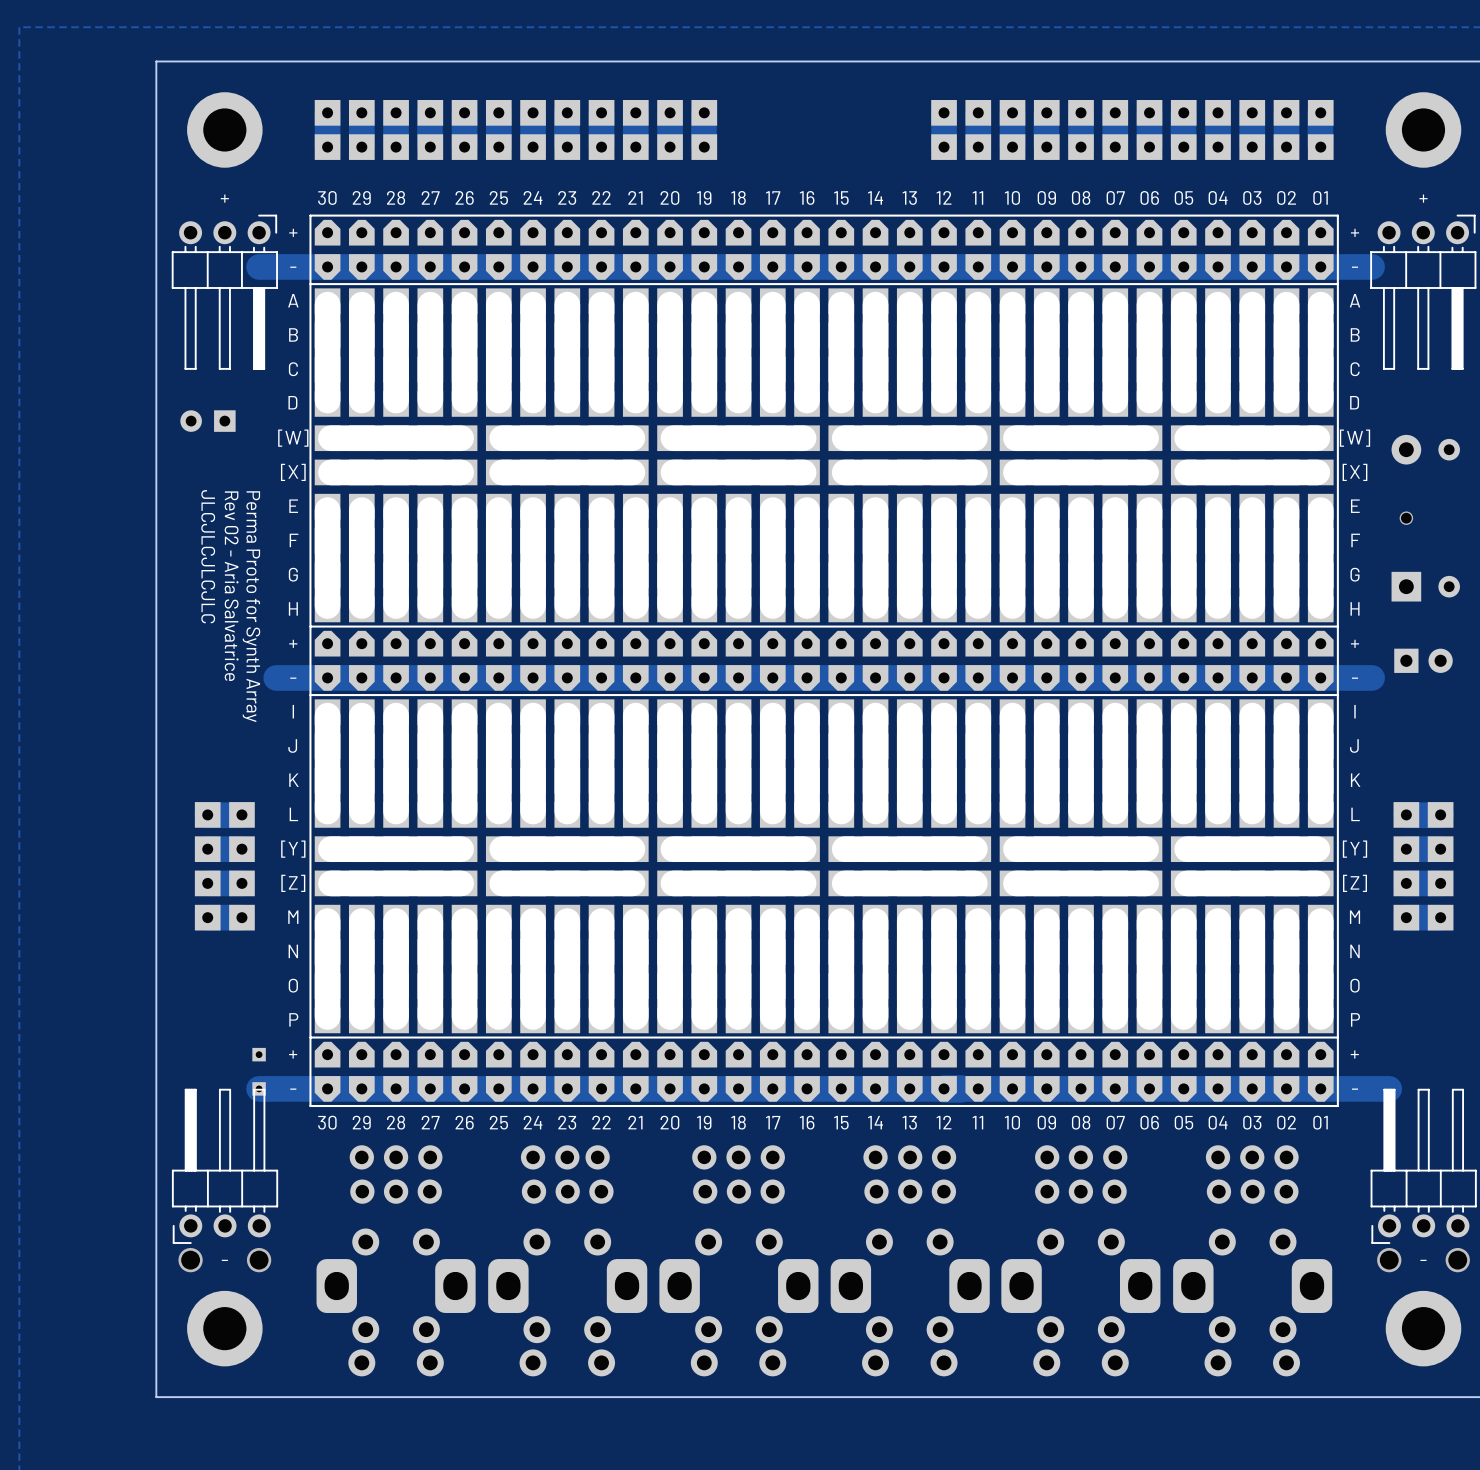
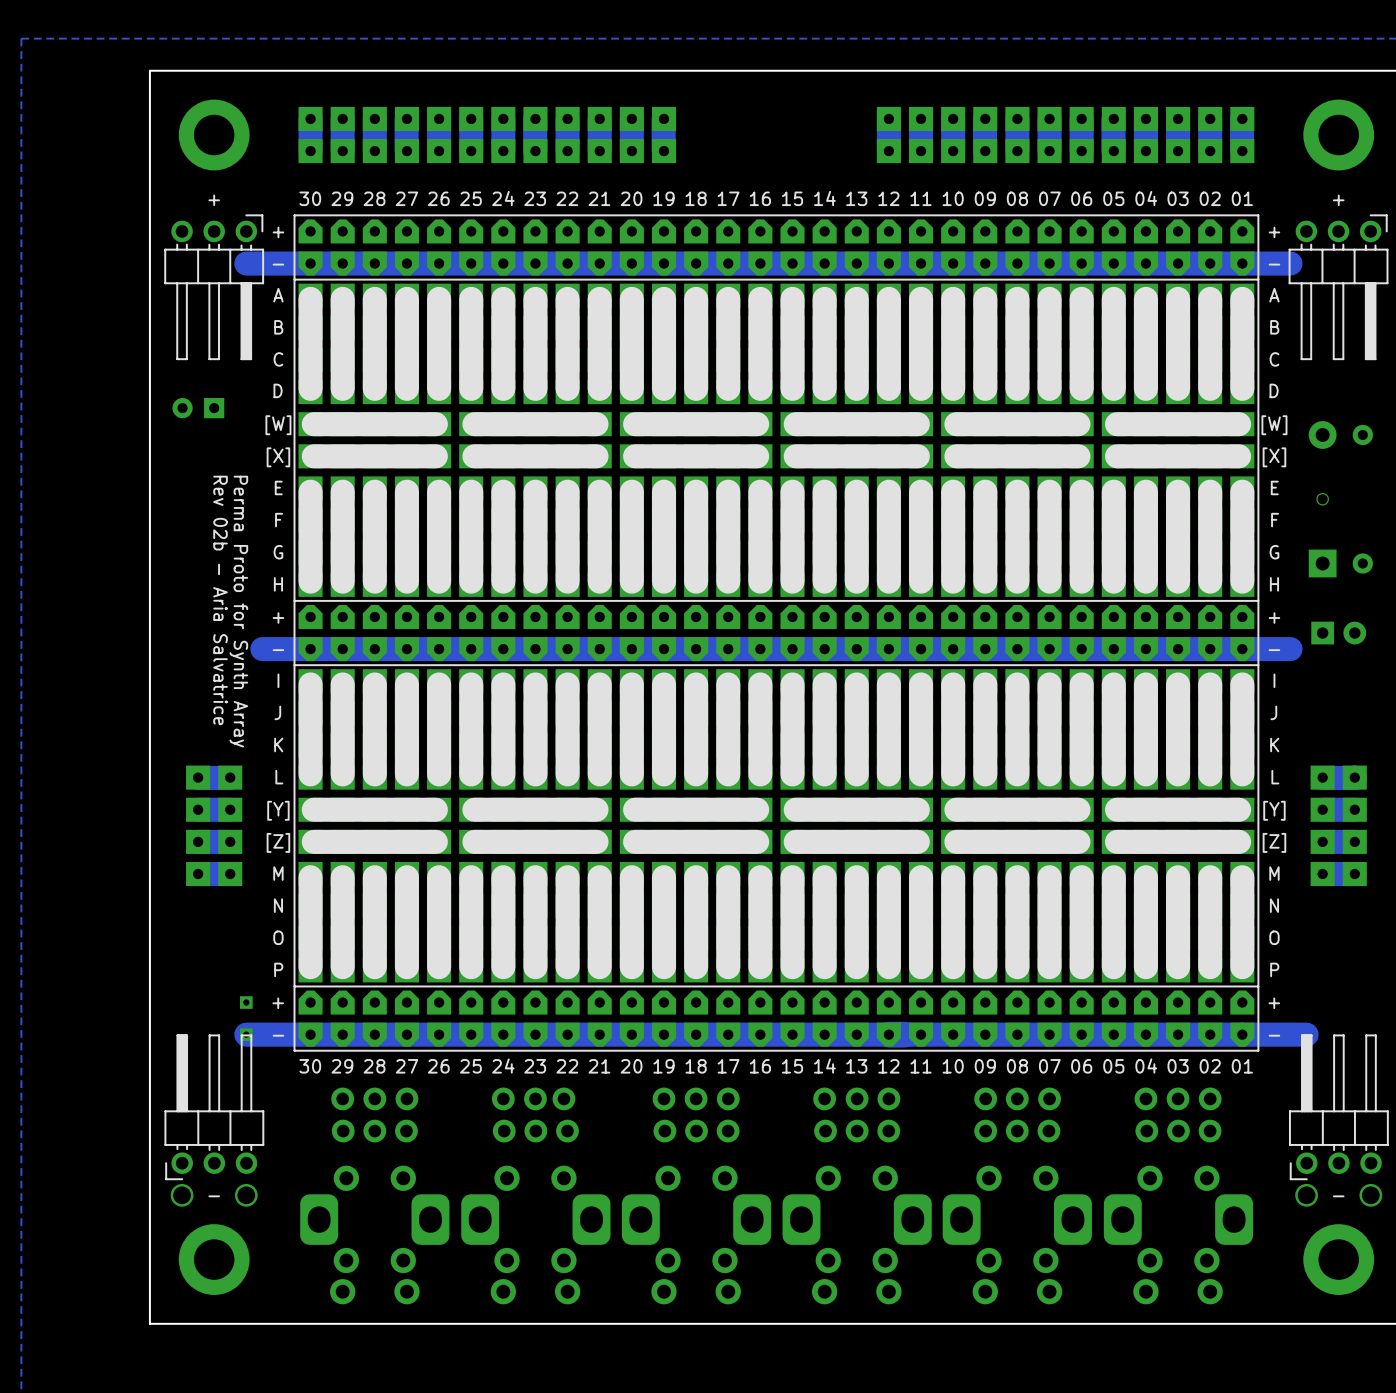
text: JLCJLCJLCJLC (208, 556) -> none
text: Rev 02 - Aria Salvatrice (231, 586) -> Rev 02b - Aria Salvatrice (220, 600)

